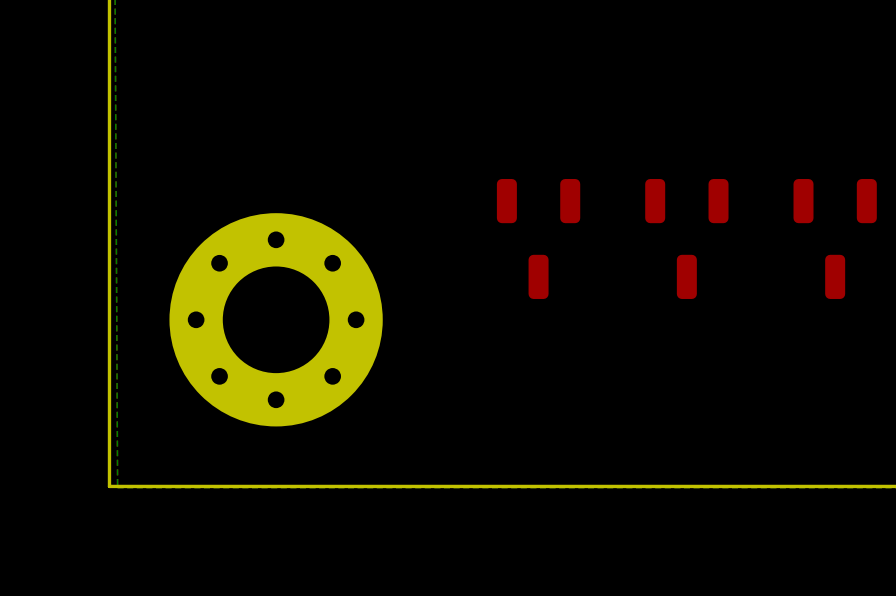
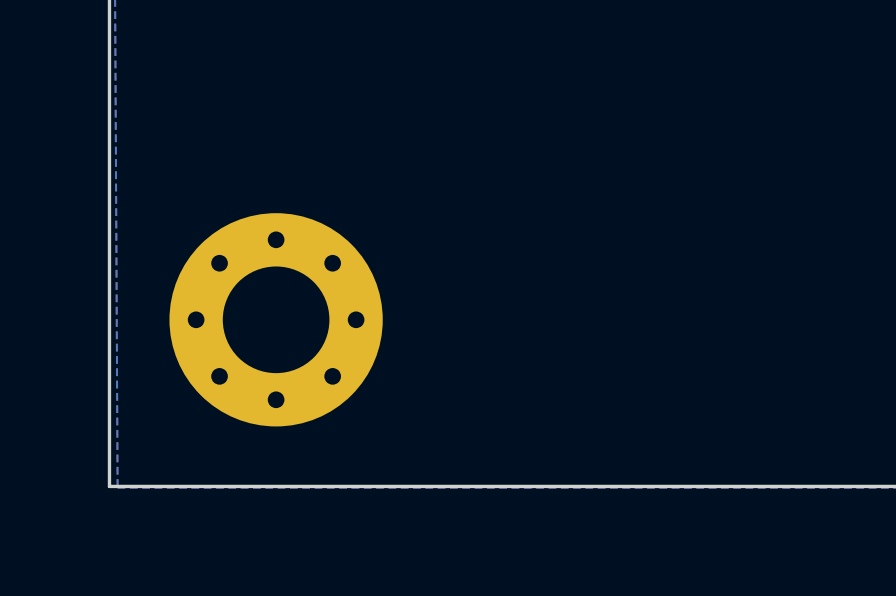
part: (538, 238) -> none
part: (686, 238) -> none
part: (835, 238) -> none

